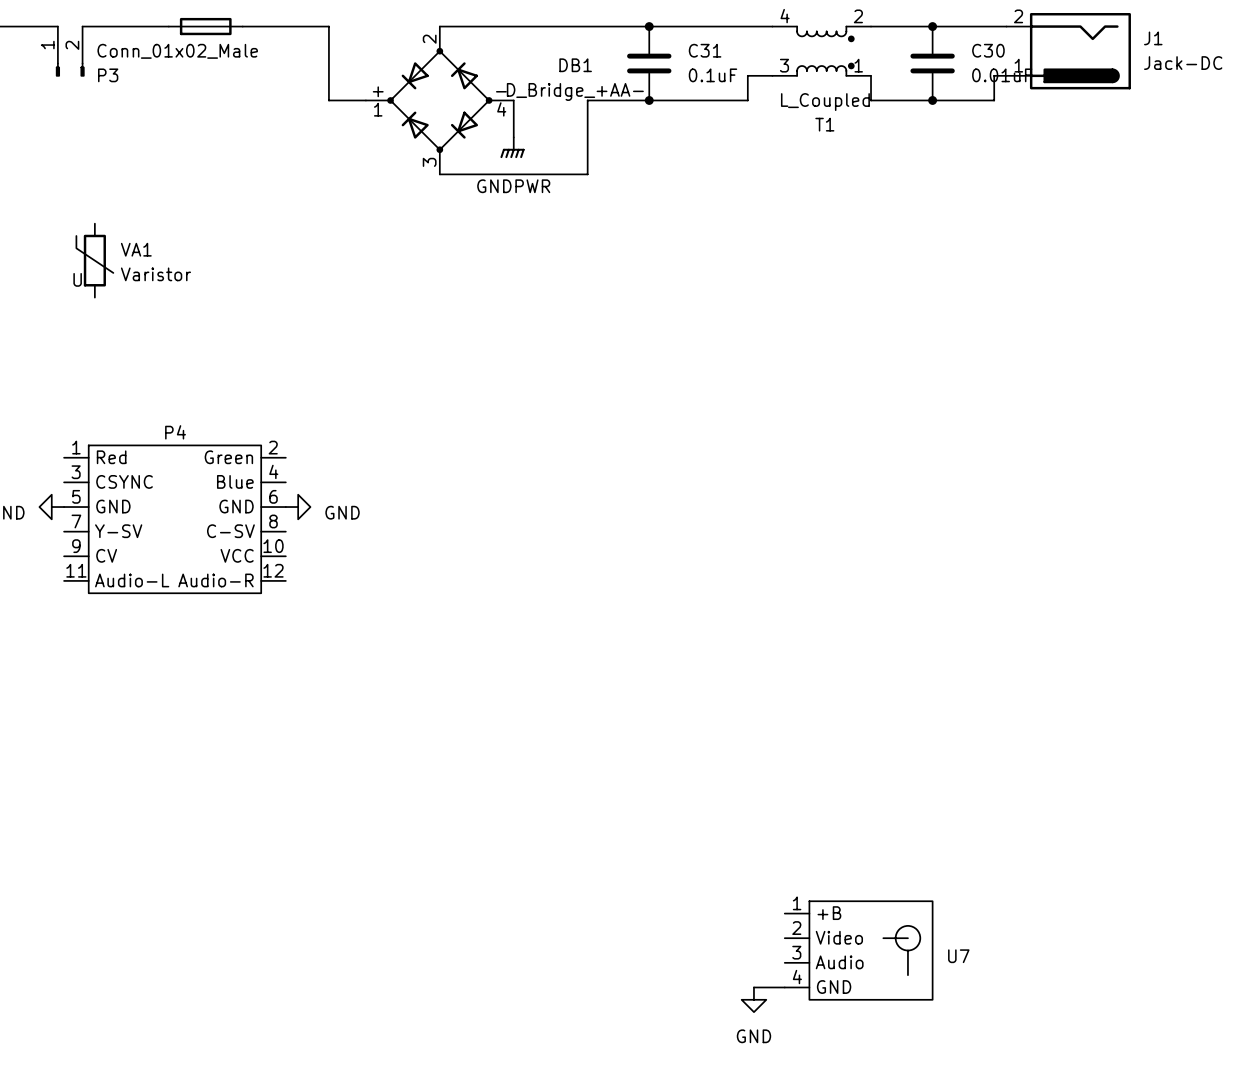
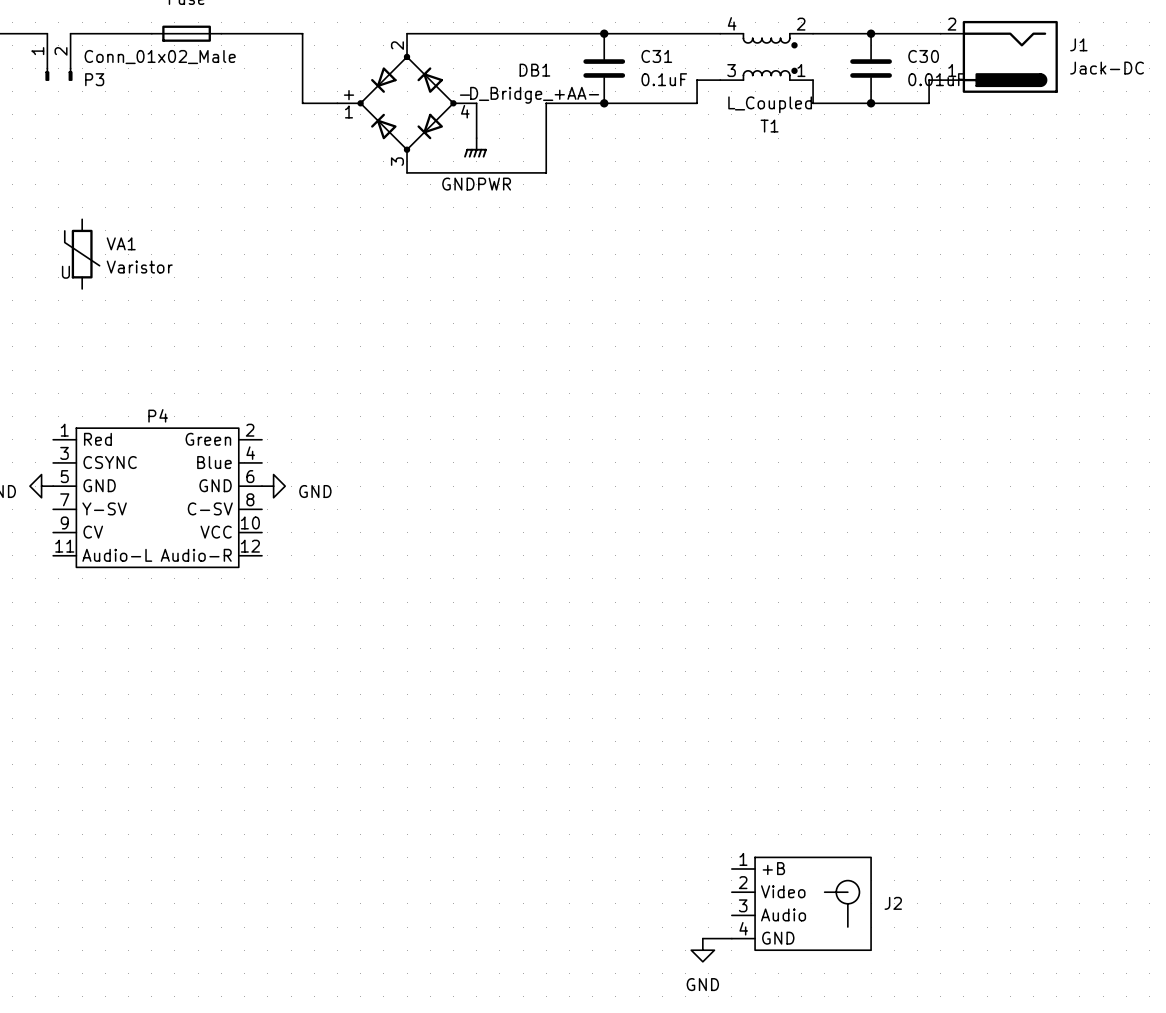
U7 name: U7 (958, 956) -> J2 (893, 903)

